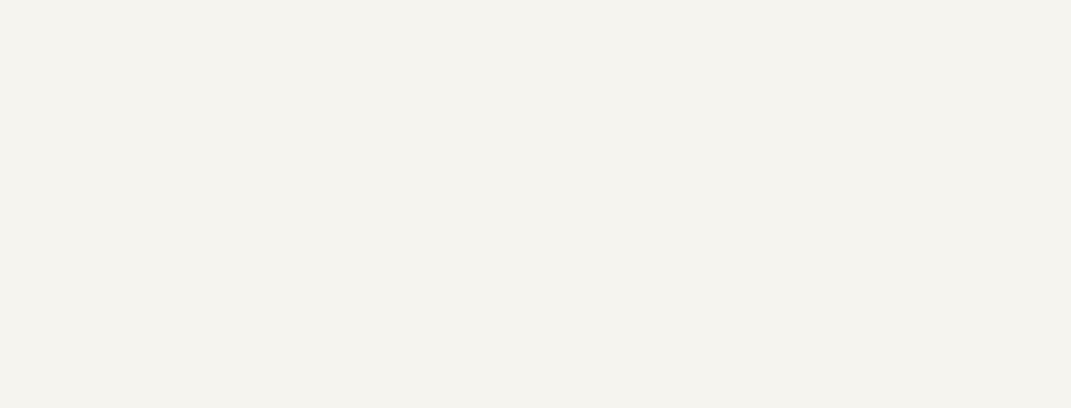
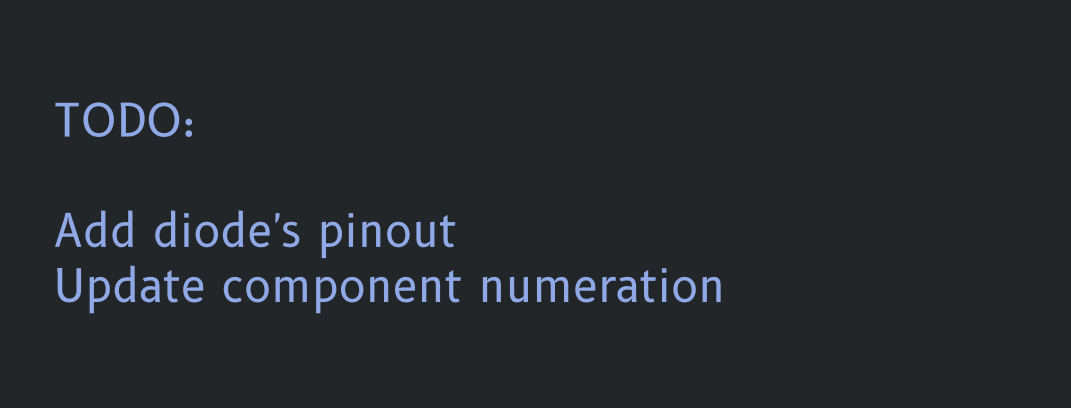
text: none -> TODO: (123, 119)
text: none -> Add diode's pinout (255, 234)
text: none -> Update component numeration (388, 289)

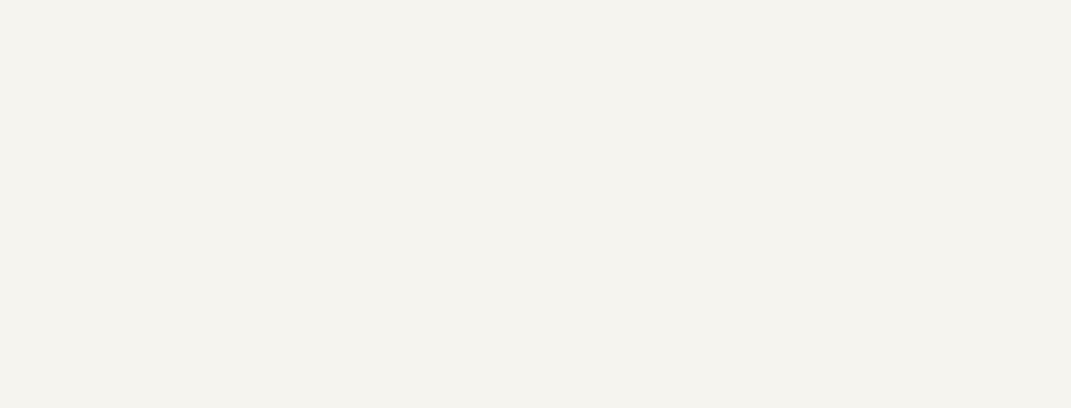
text: TODO: (123, 119) -> none
text: Add diode's pinout (255, 234) -> none
text: Update component numeration (388, 289) -> none

